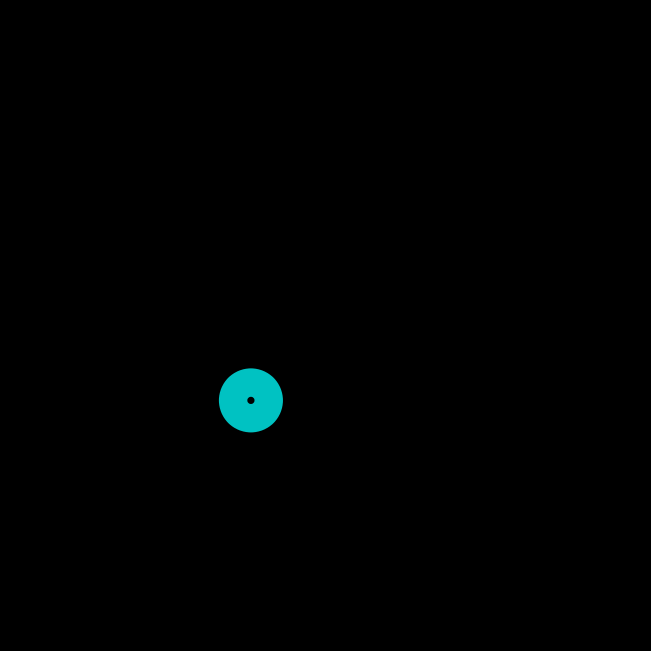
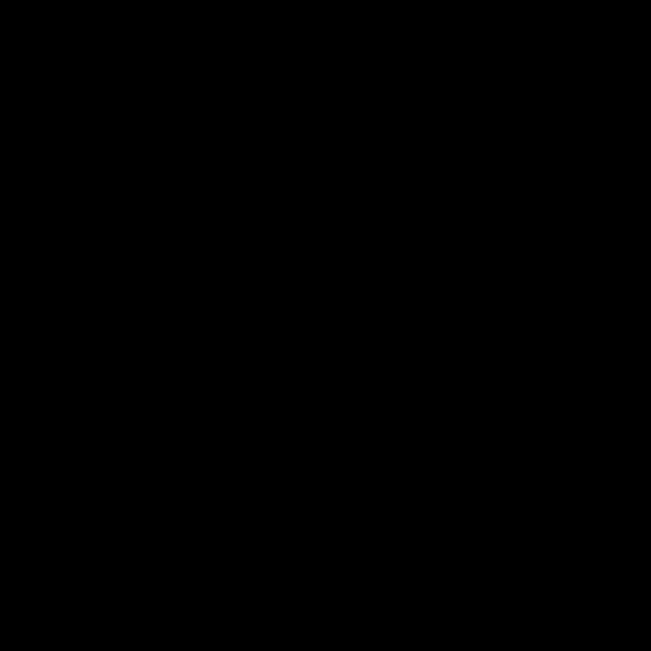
drawing: [218, 368, 283, 433] -> none

